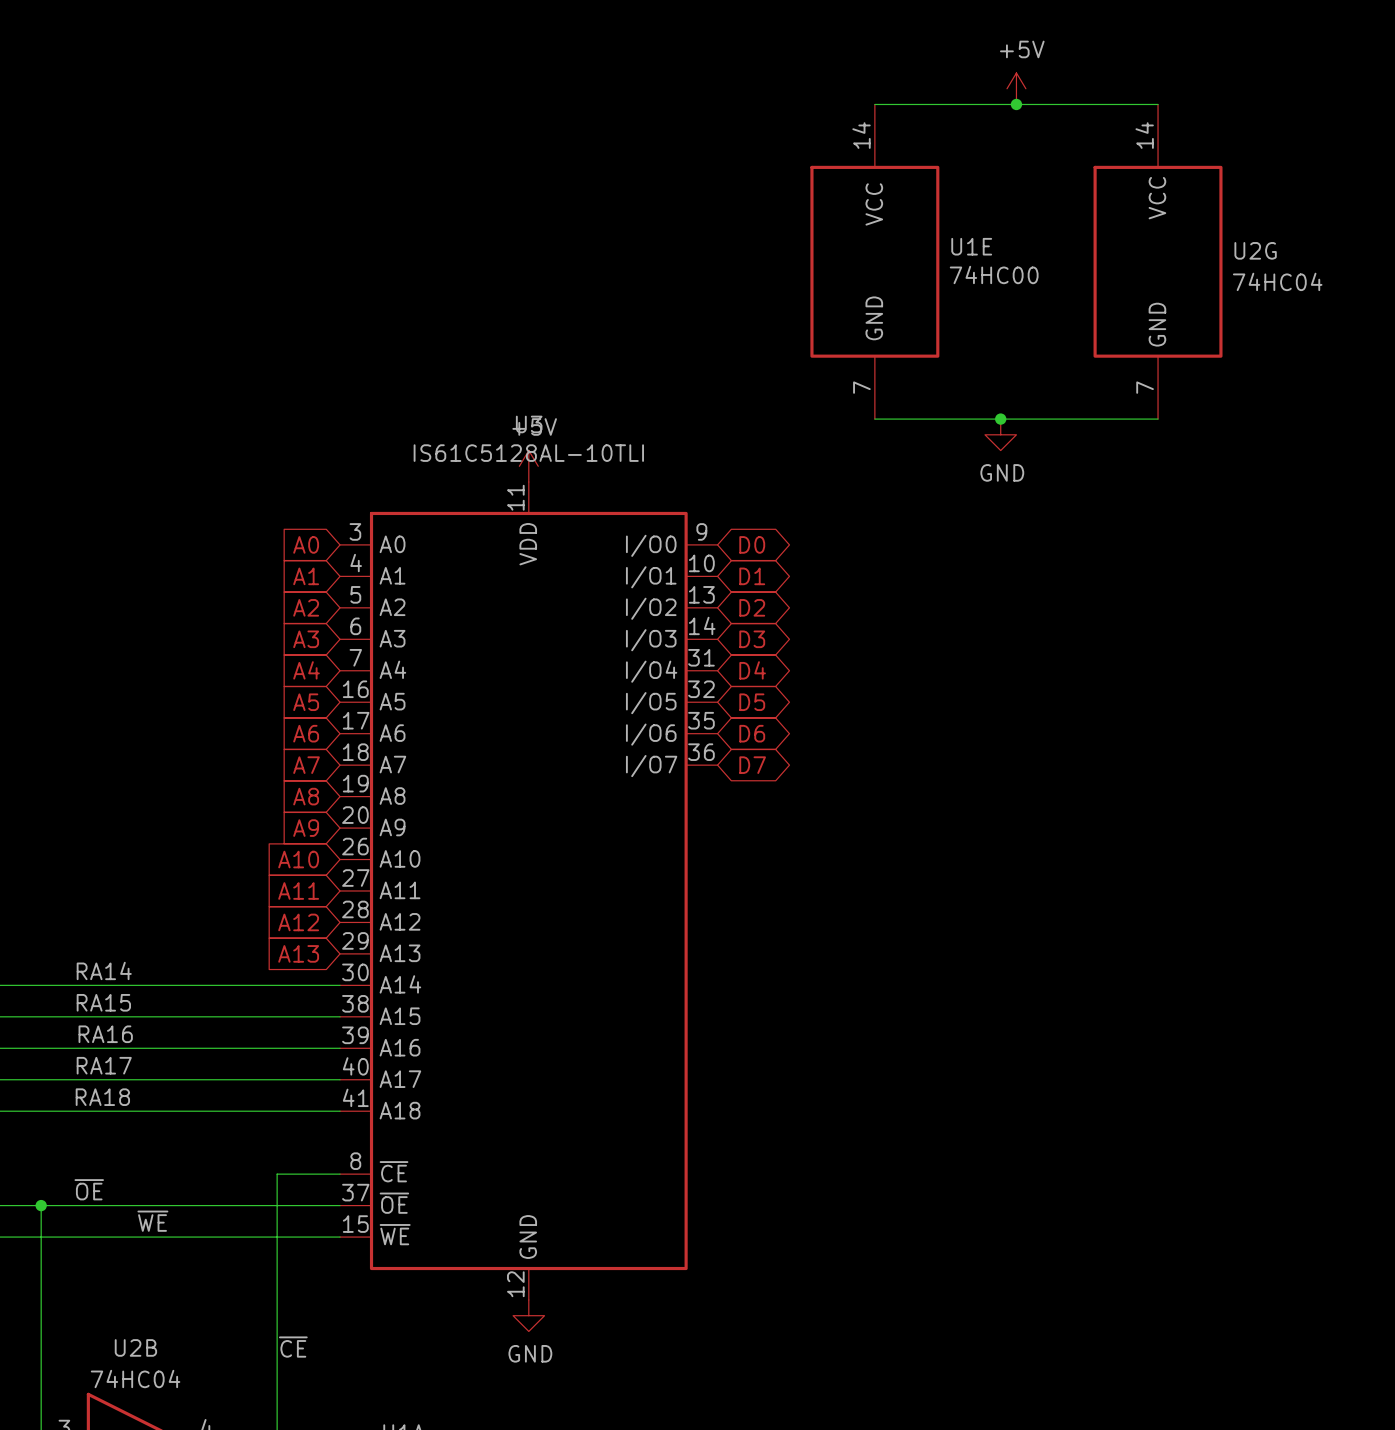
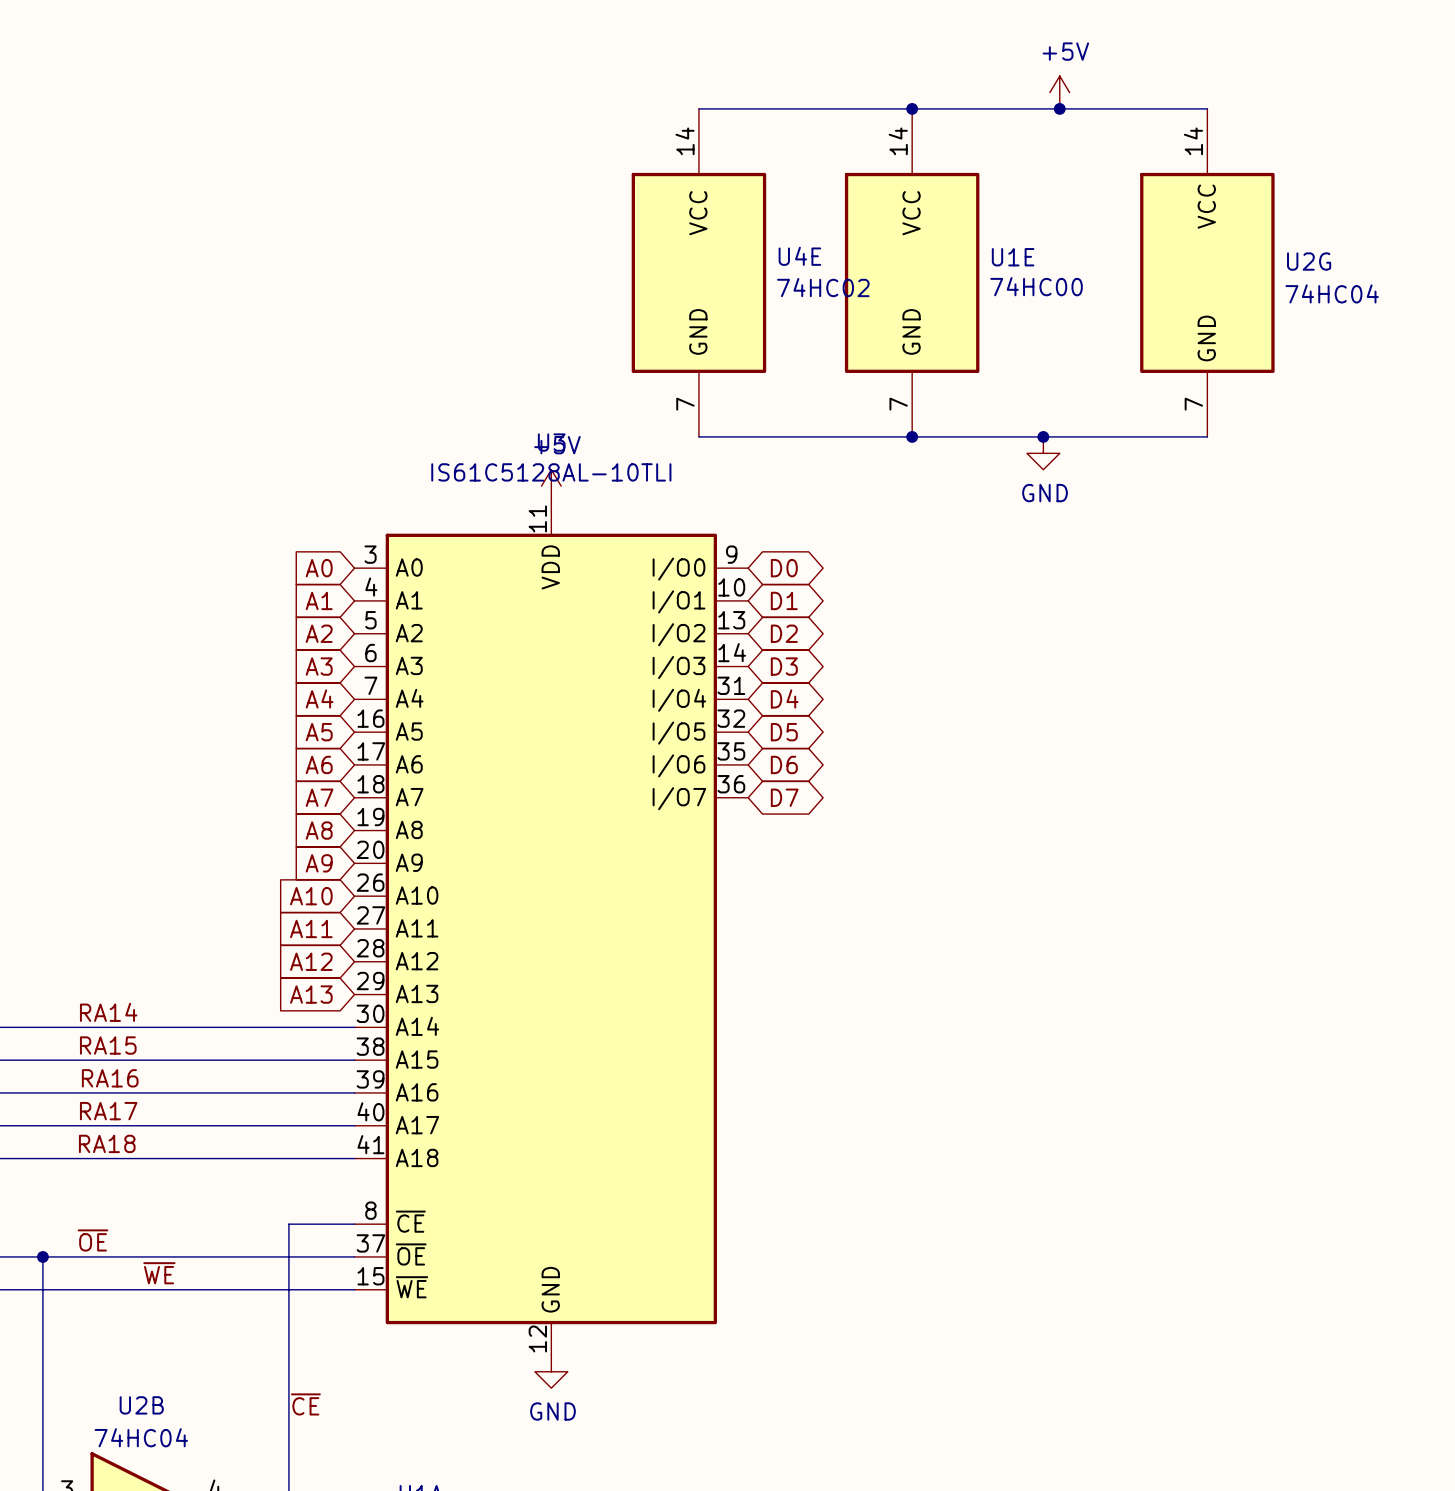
wire: none -> (698, 108) (912, 108)
junction: none -> (912, 108)
U4E: none -> 74HC02 (698, 272)
wire: none -> (698, 436) (912, 436)
junction: none -> (912, 436)

